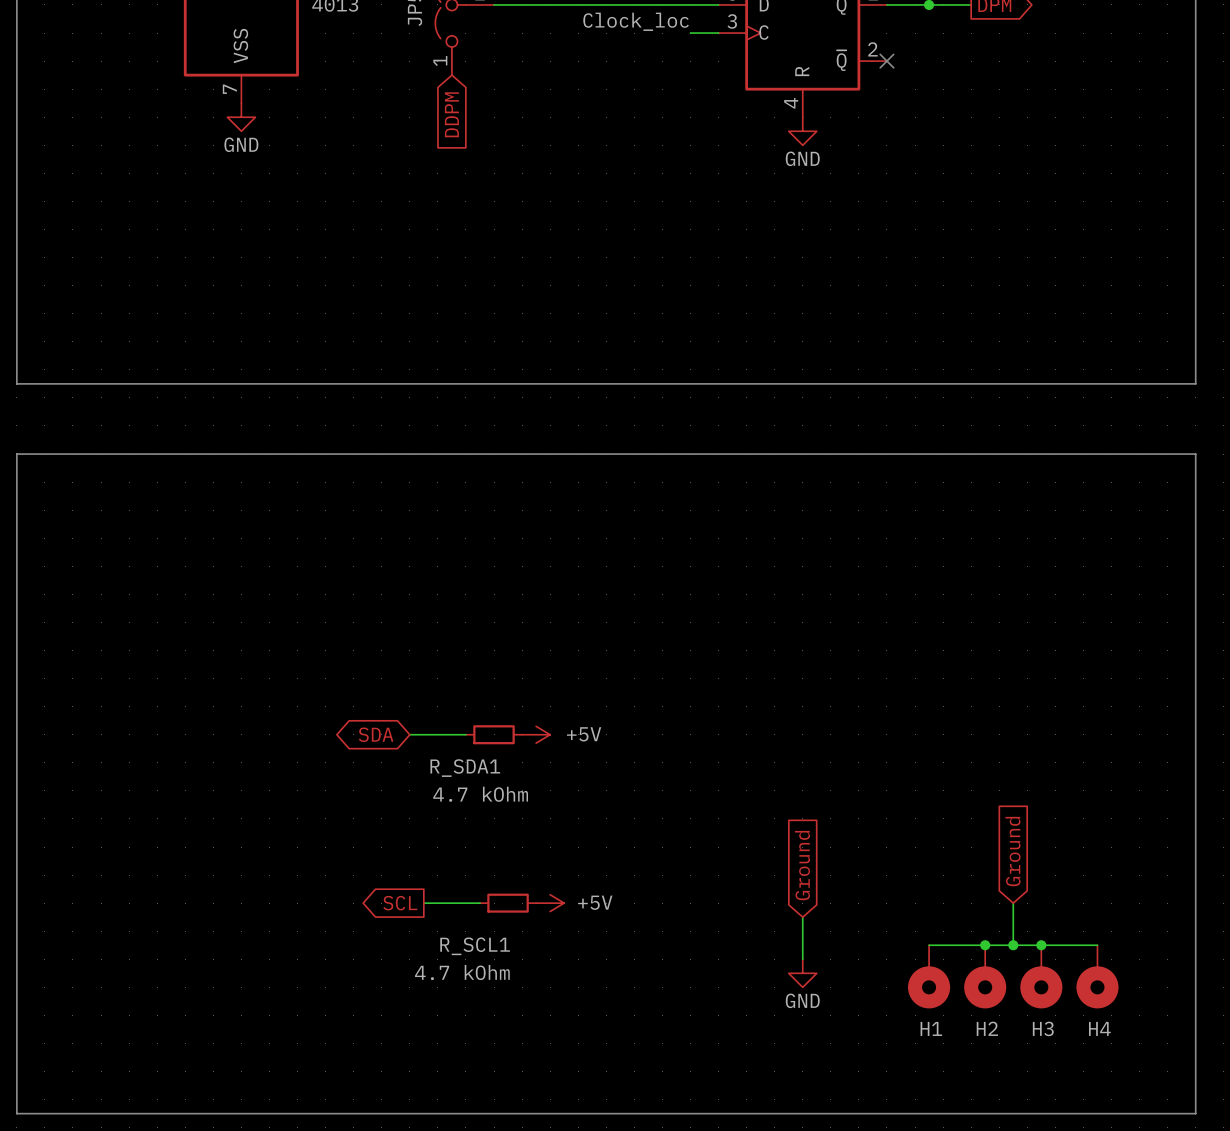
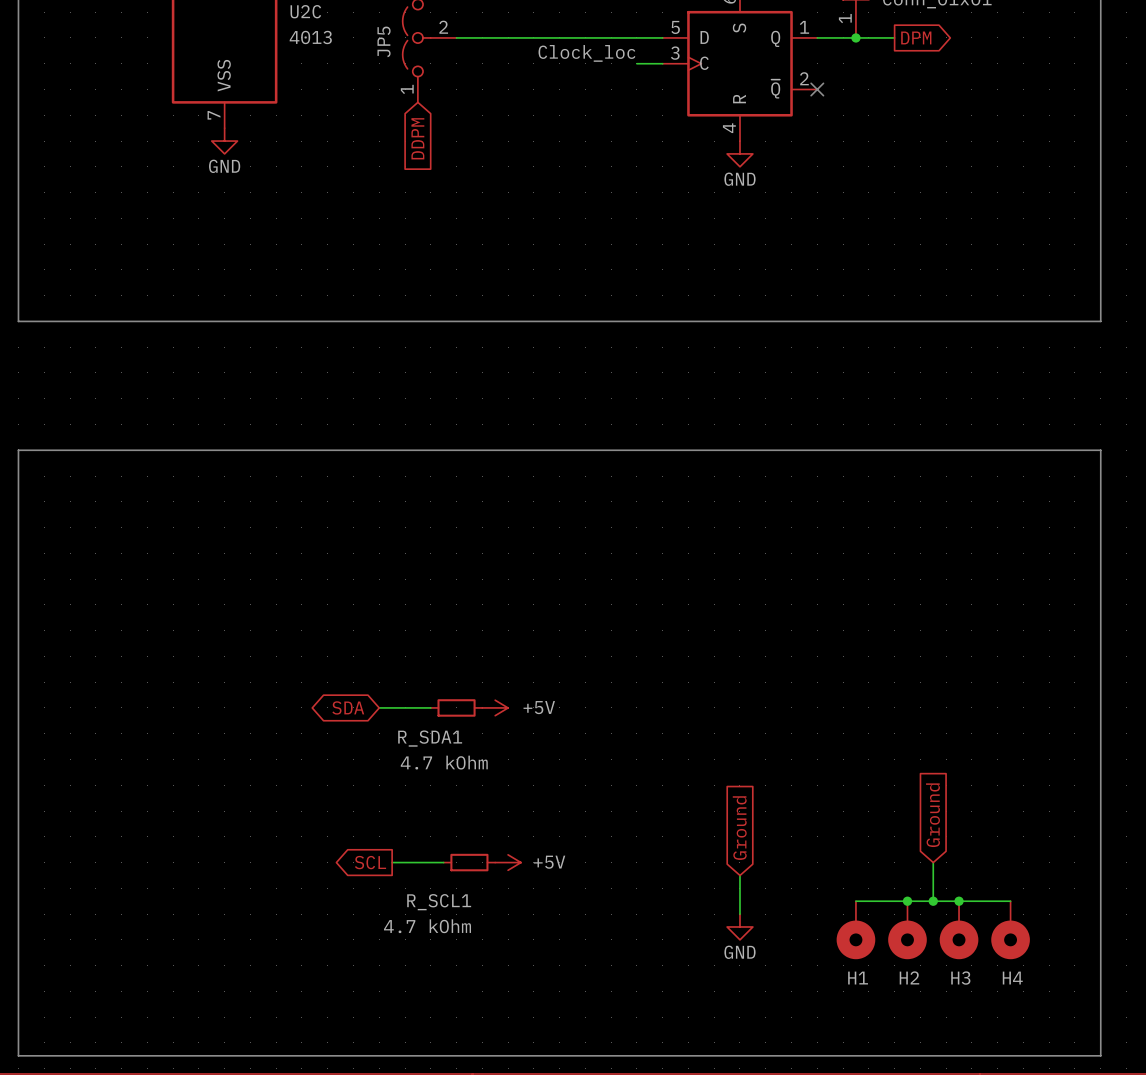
line: (16, 313) (16, 383) (1195, 383) (1195, 313) -> (18, 321) (1100, 321)

